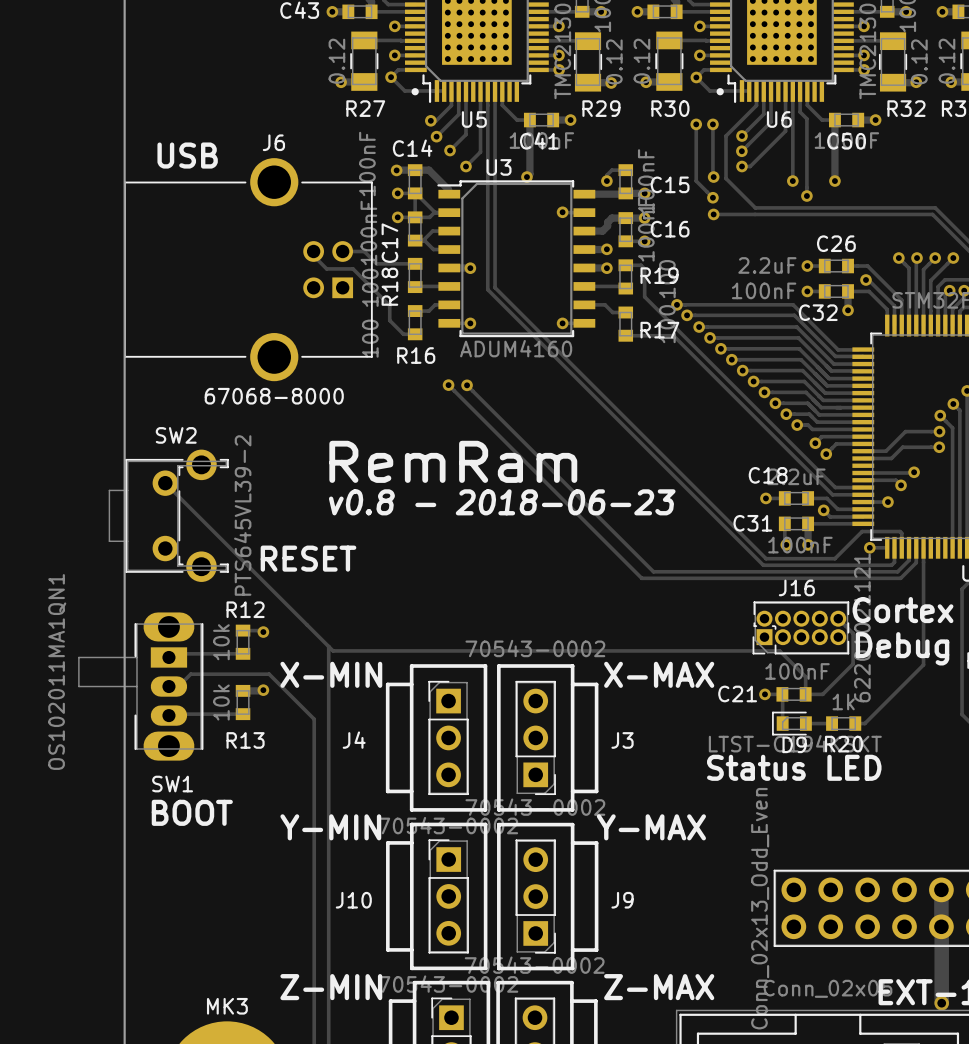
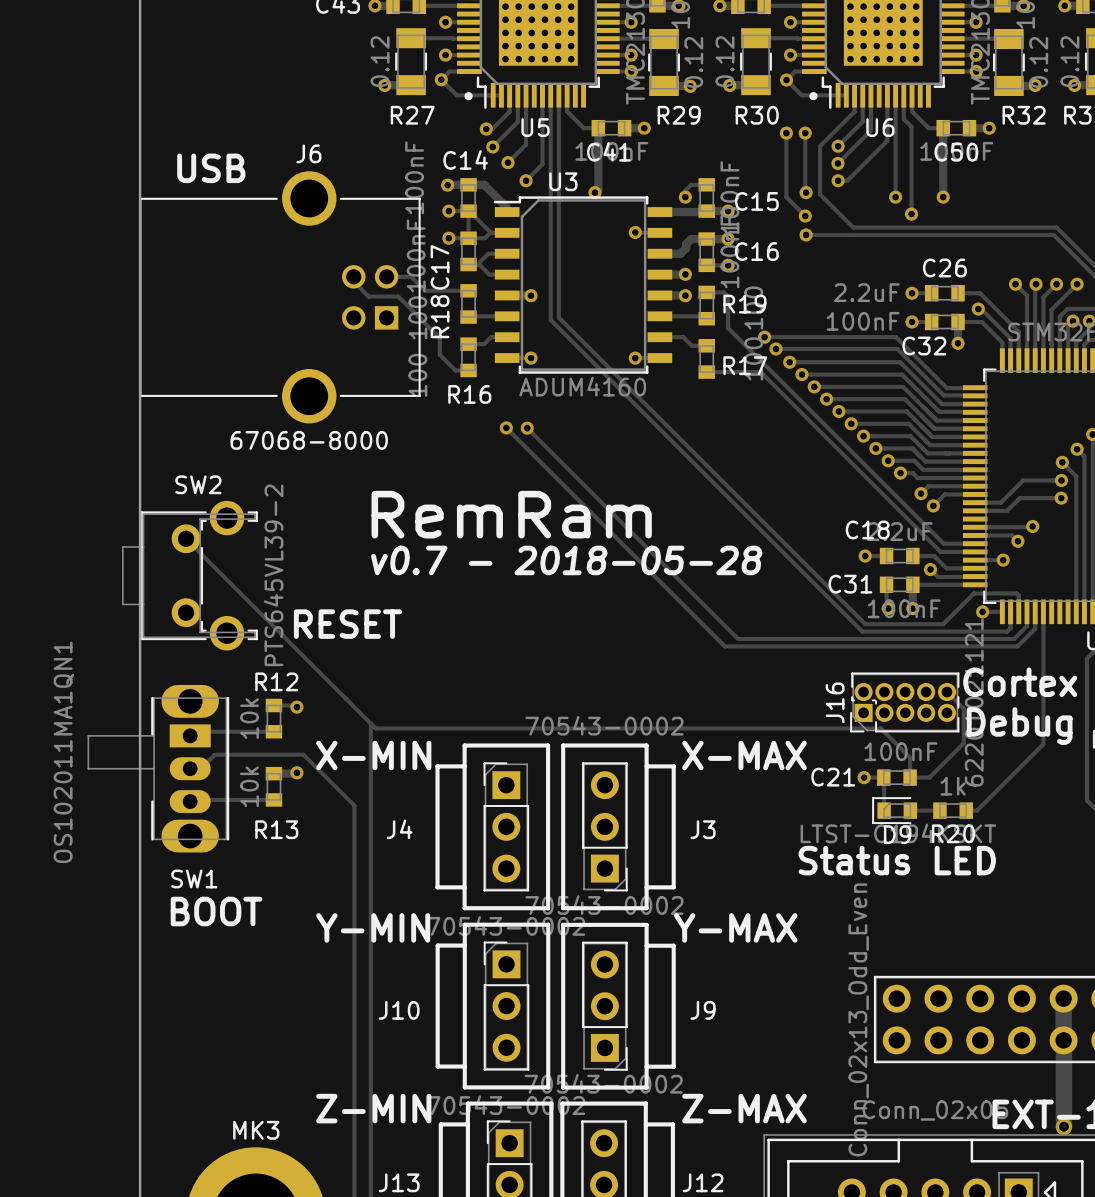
text: v0.8 - 2018-06-23 (502, 502) -> v0.7 - 2018-05-28 (566, 560)
J16 name rotation: 0° (796, 587) -> 90° counterclockwise (835, 702)
J16 name position: J16 (796, 587) -> J16 (835, 702)

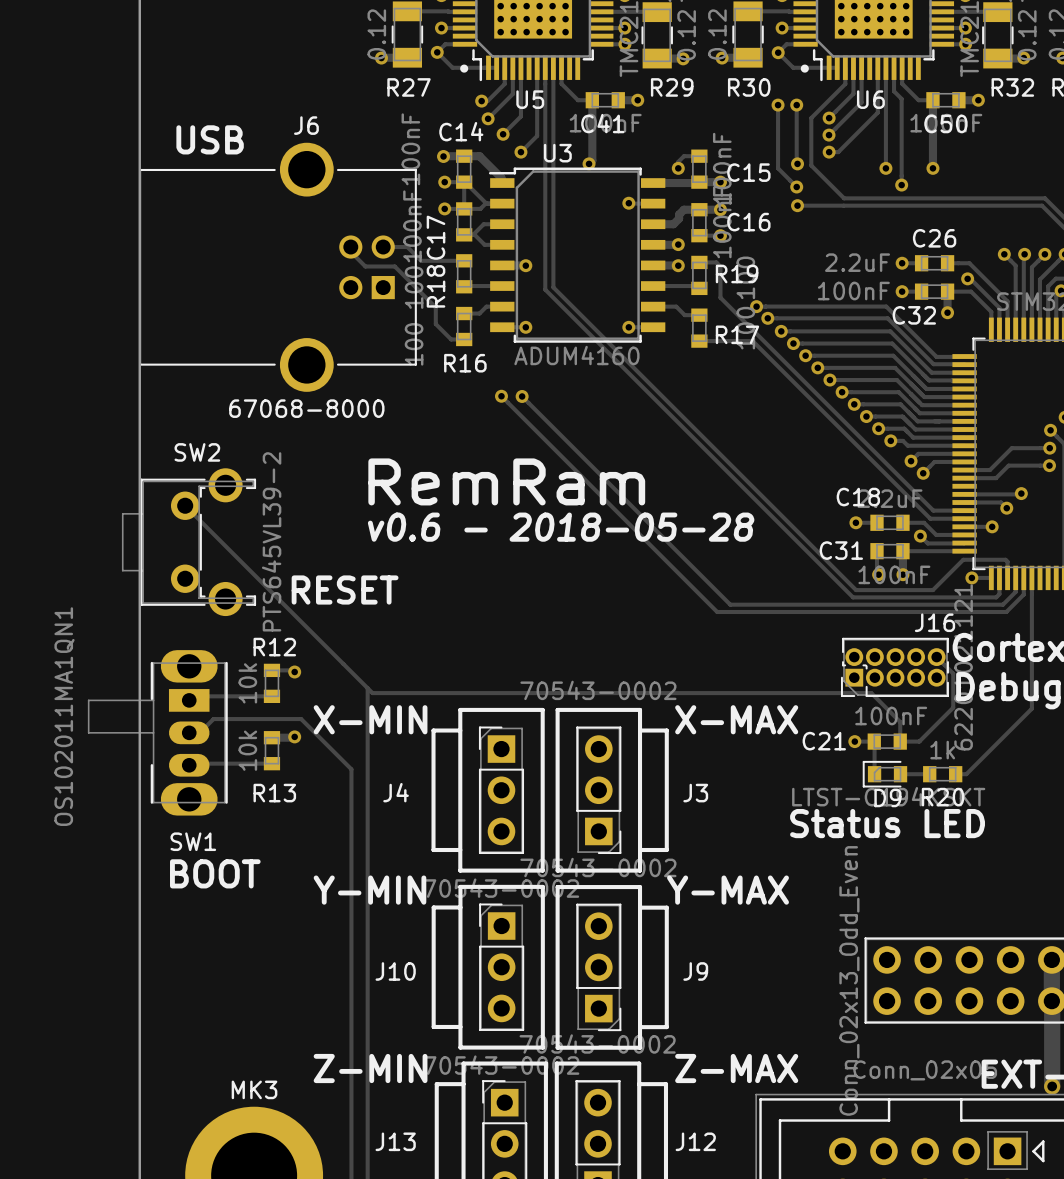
text: v0.7 - 2018-05-28 (566, 560) -> v0.6 - 2018-05-28 (561, 527)
J16 name rotation: 0° (835, 702) -> 90° clockwise (935, 622)
J16 name position: J16 (835, 702) -> J16 (935, 622)

